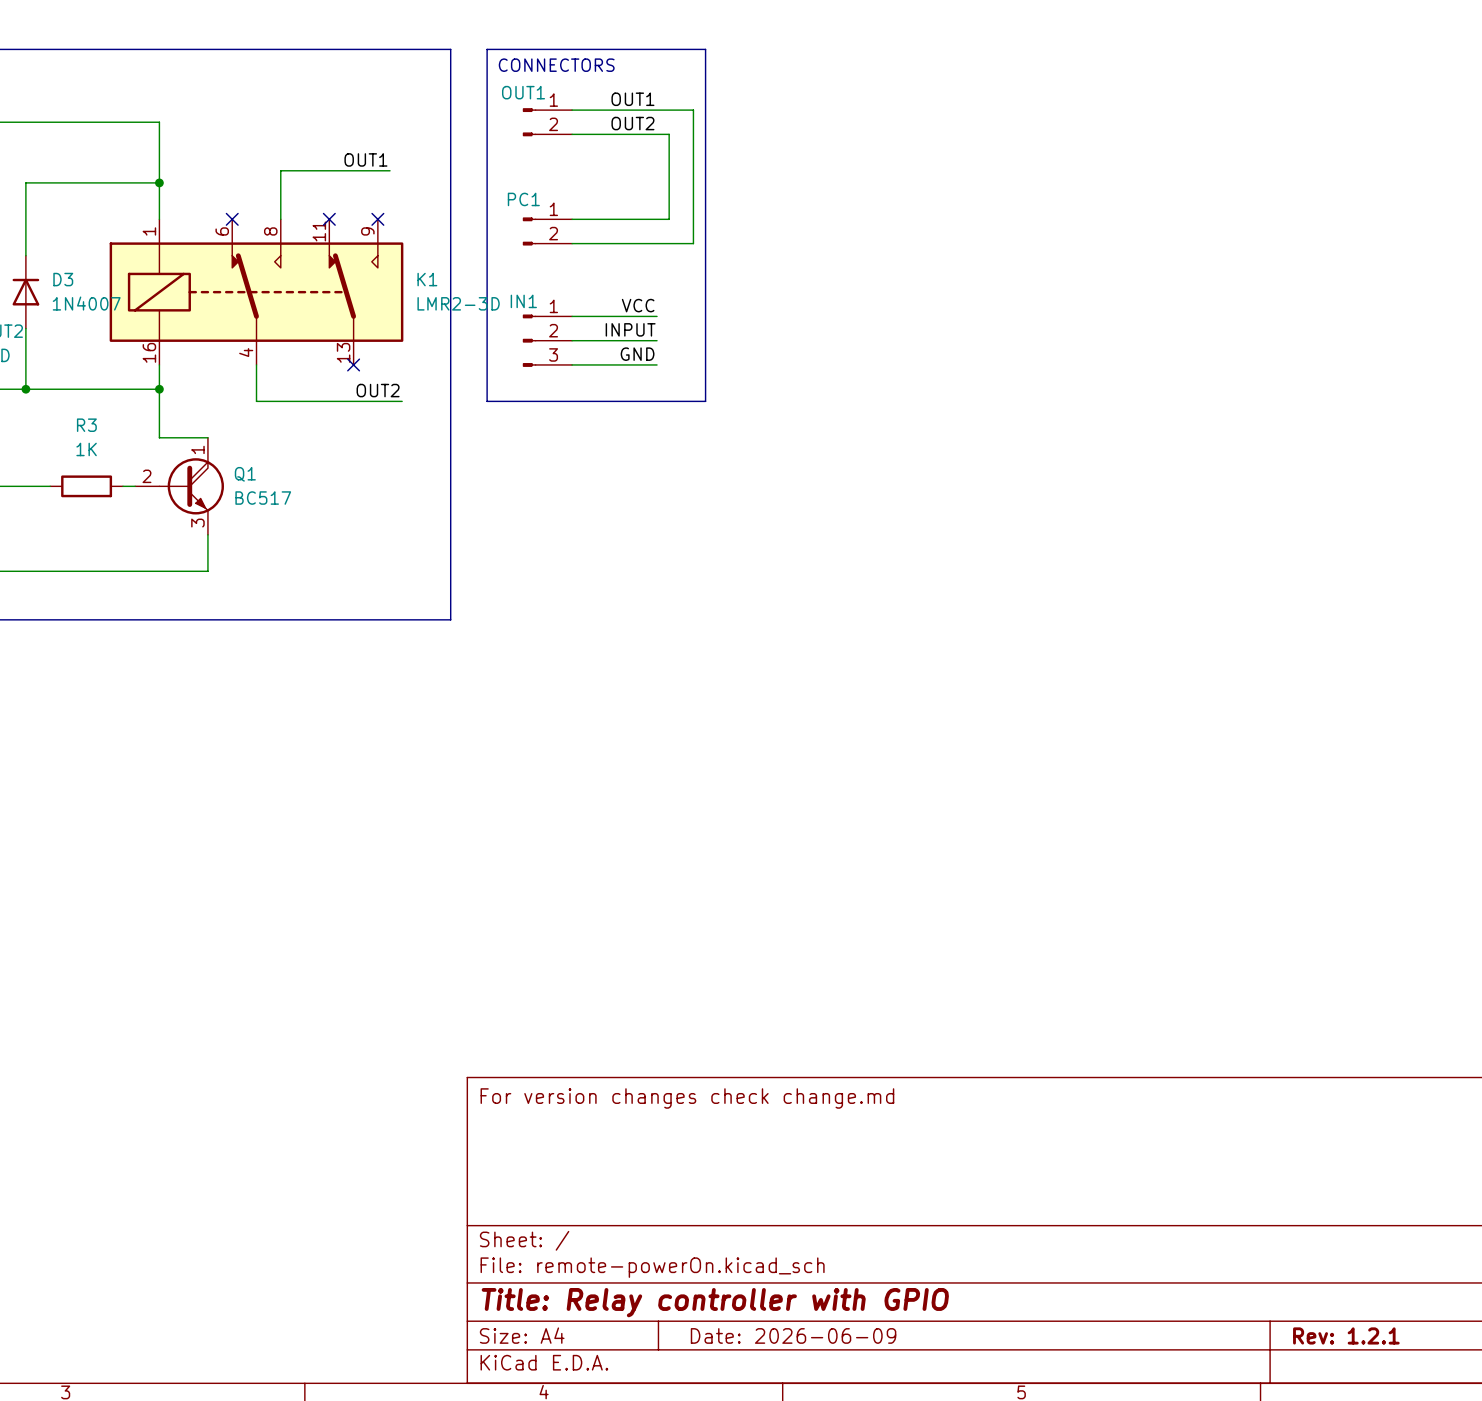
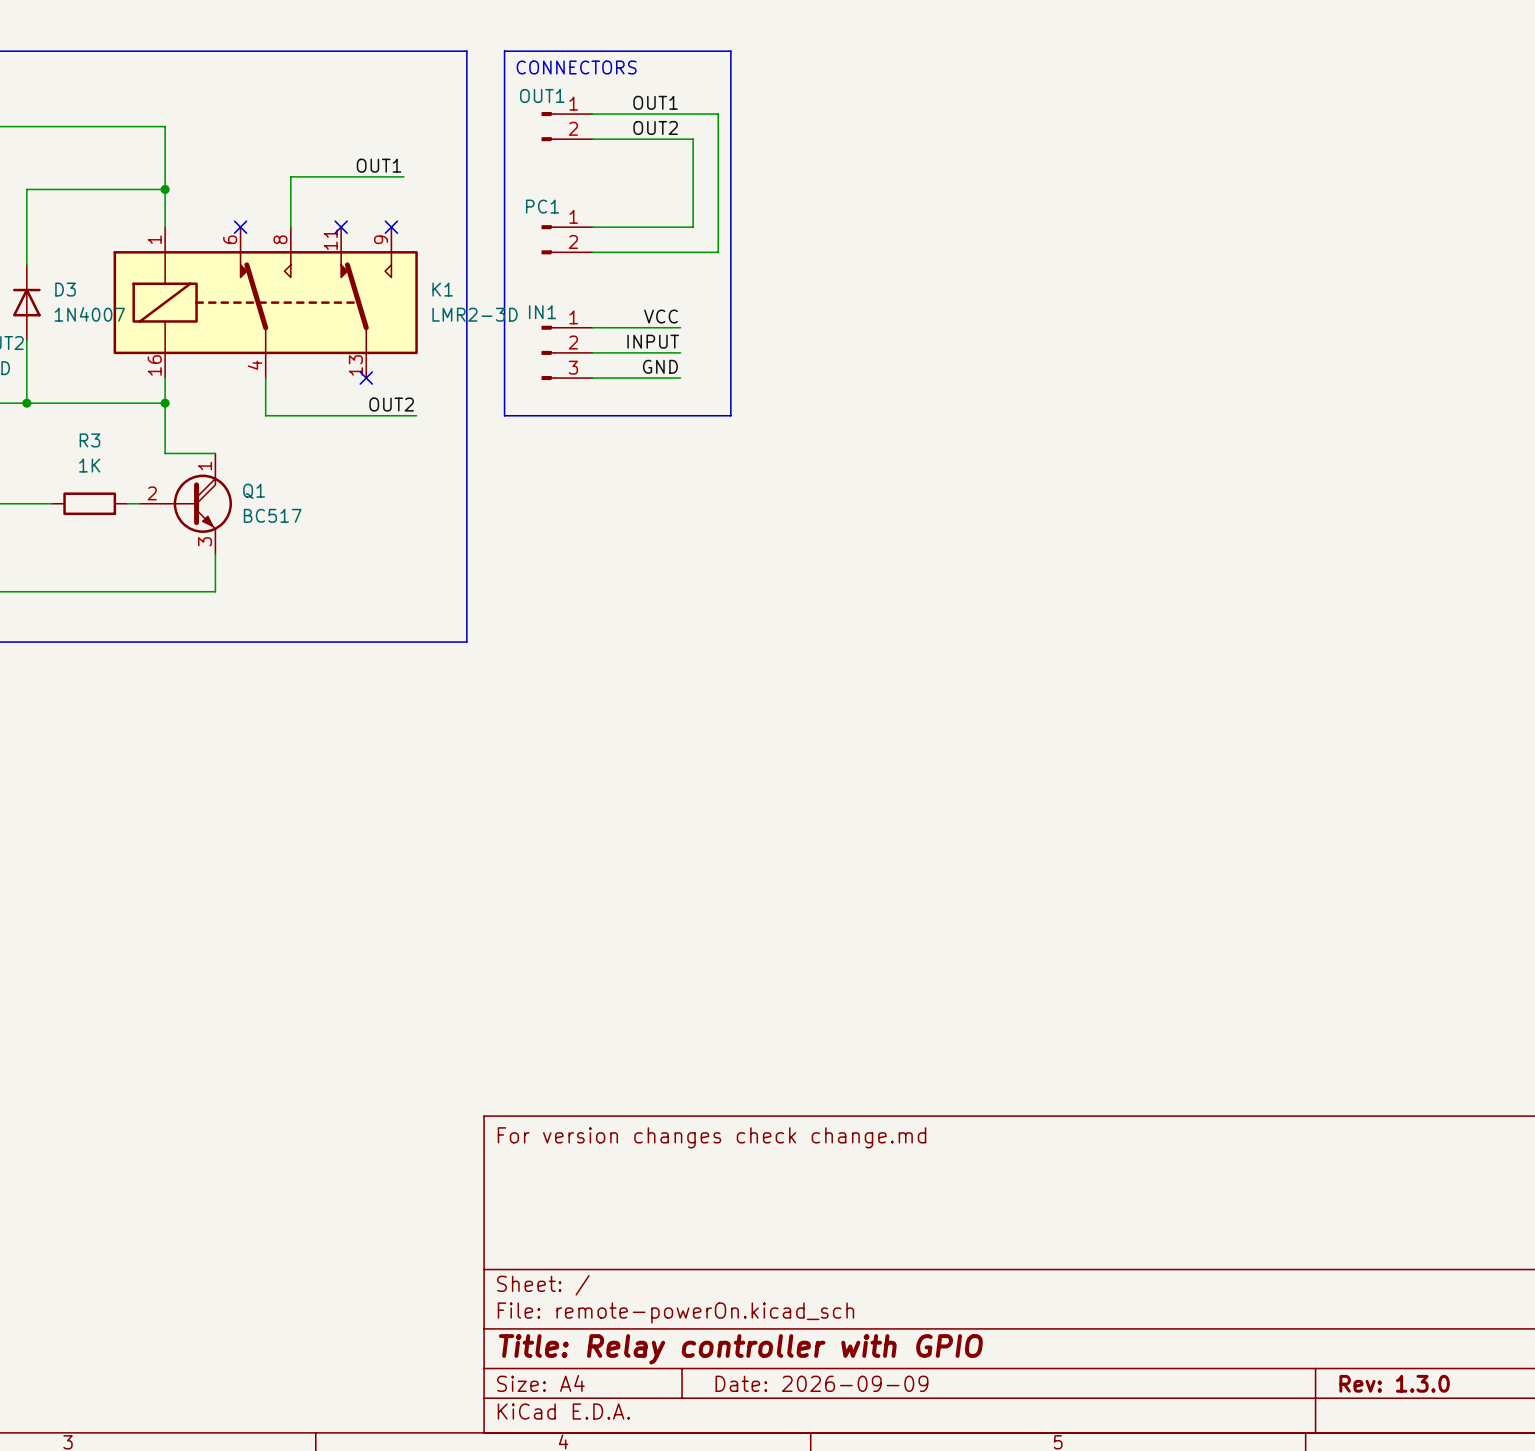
title block: Date: 2026-06-09 (793, 1335) -> Date: 2026-09-09 (821, 1383)
title block: Rev: 1.2.1 (1346, 1335) -> Rev: 1.3.0 (1394, 1383)

